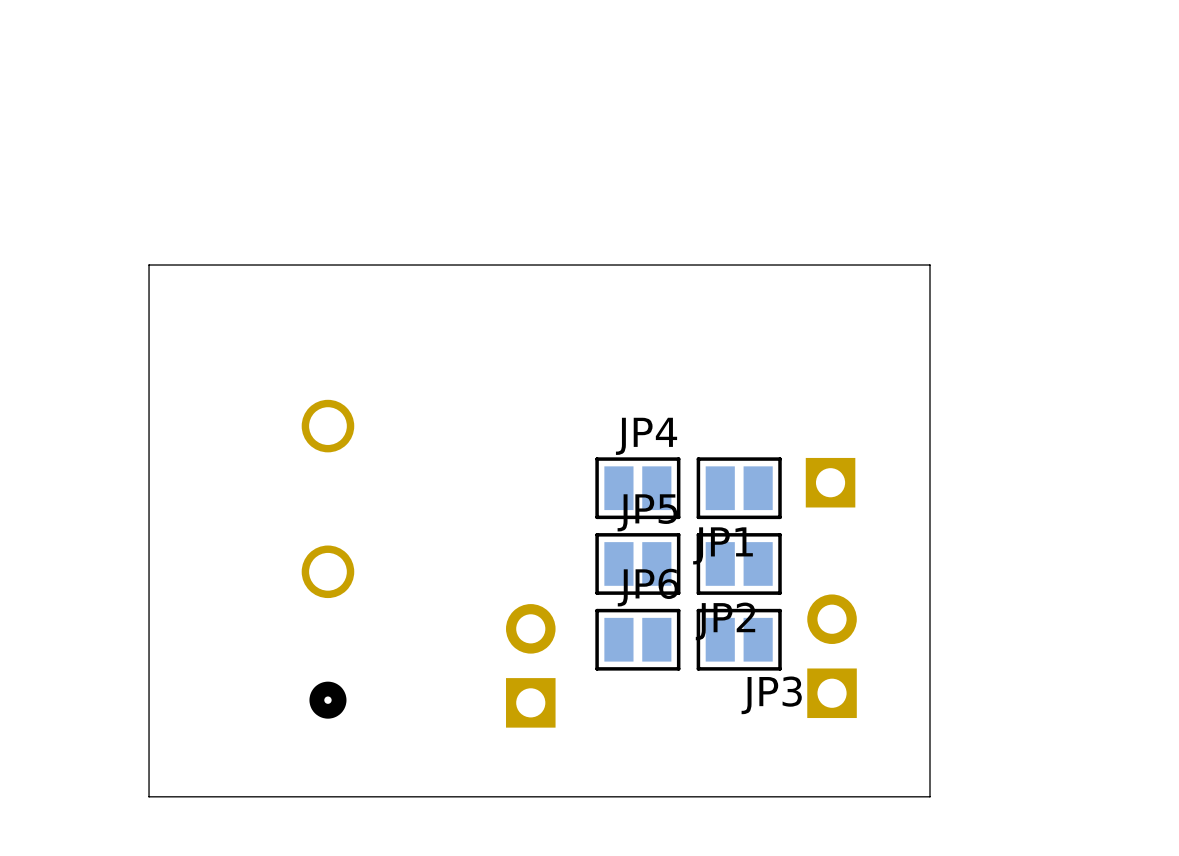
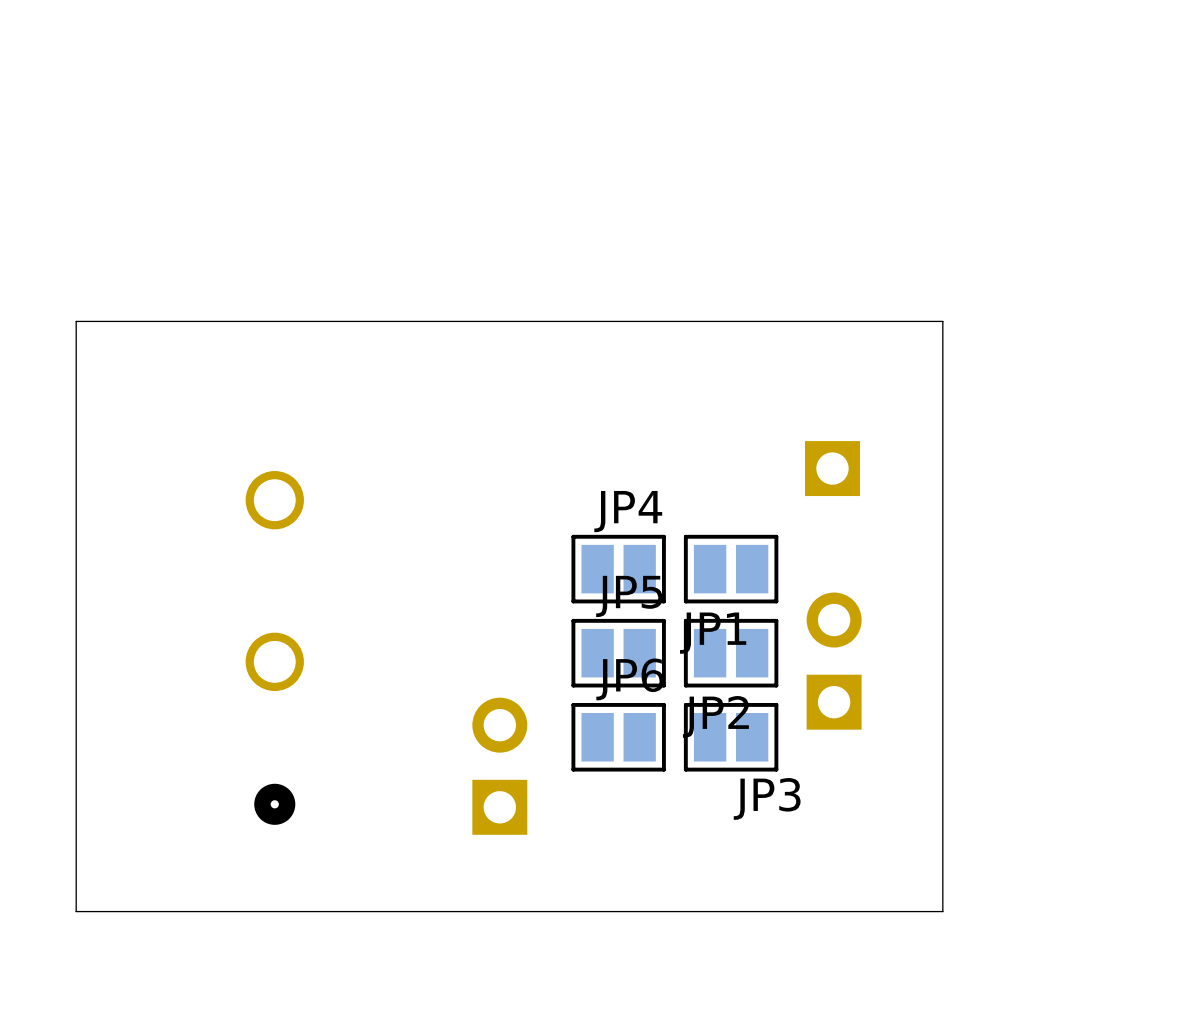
part position: (830, 482) -> (832, 468)
part position: (832, 656) -> (834, 661)

